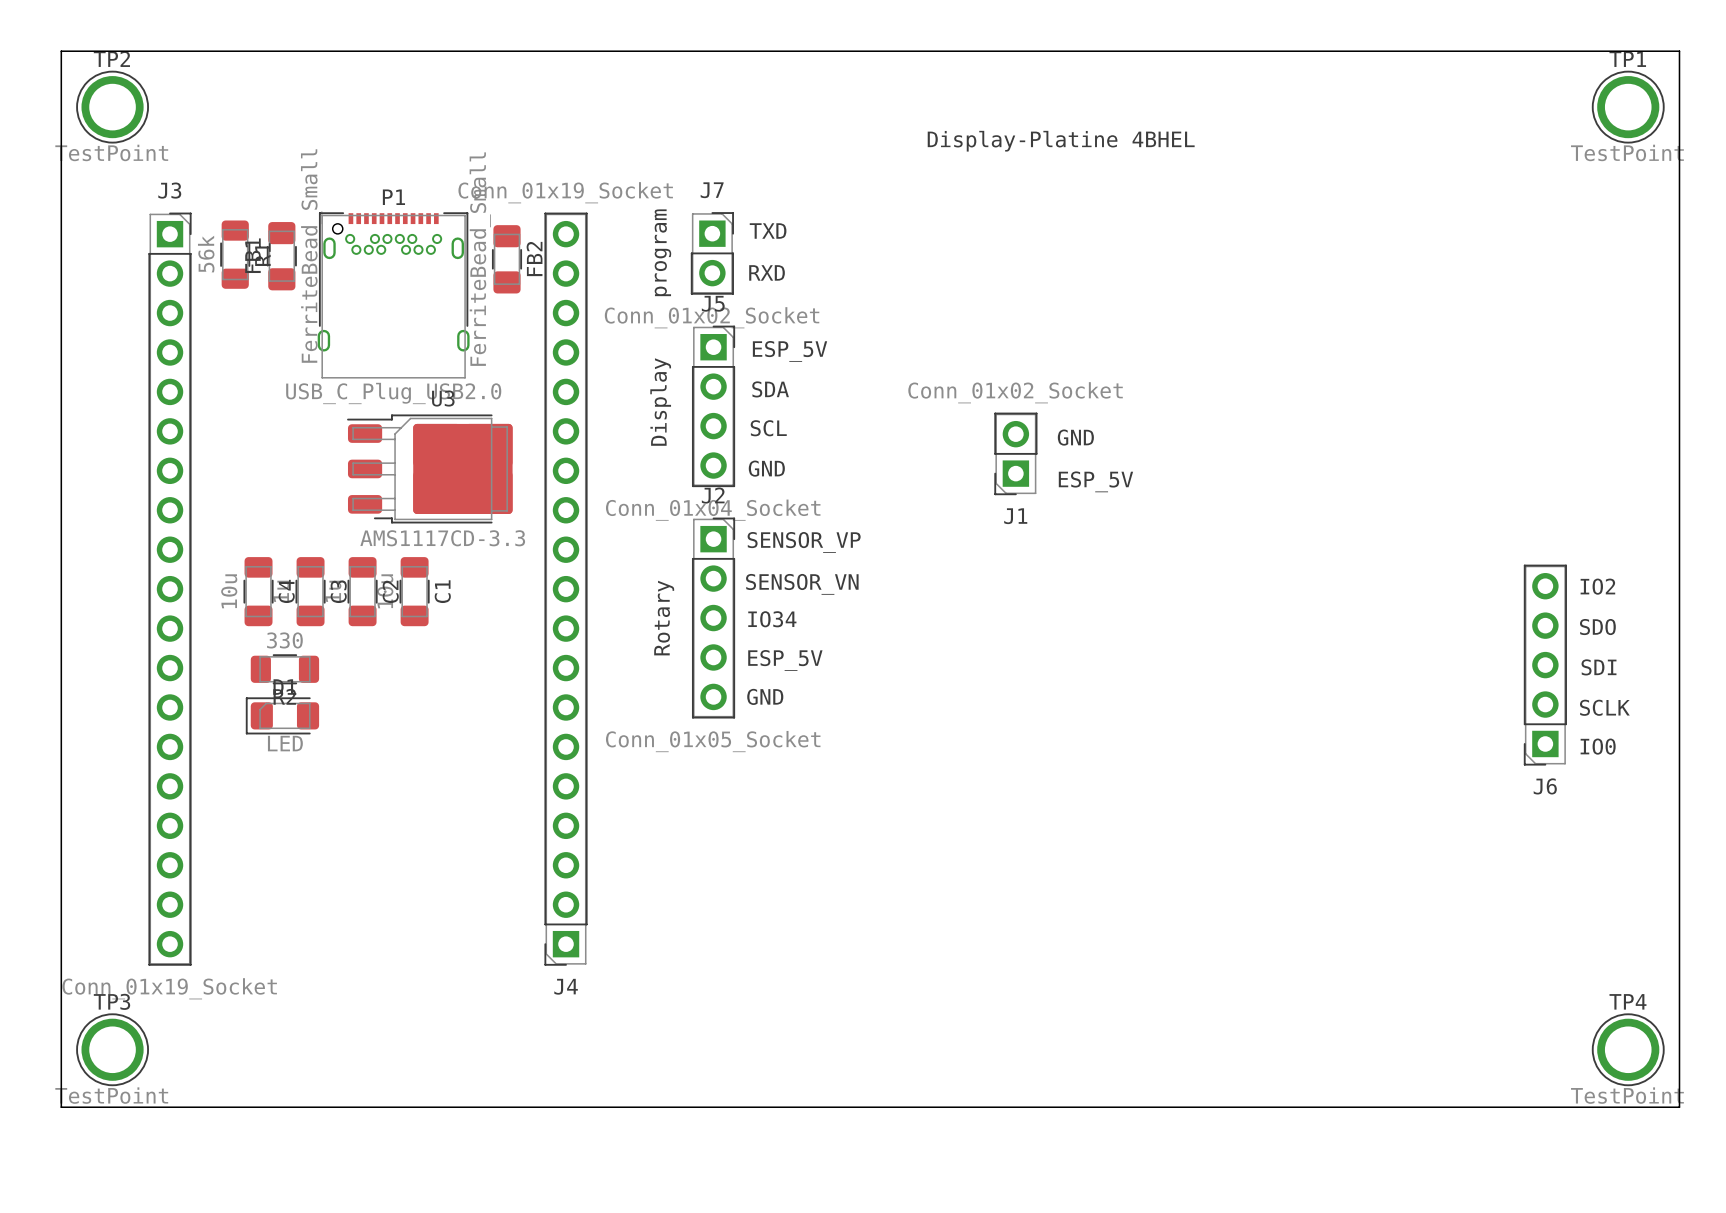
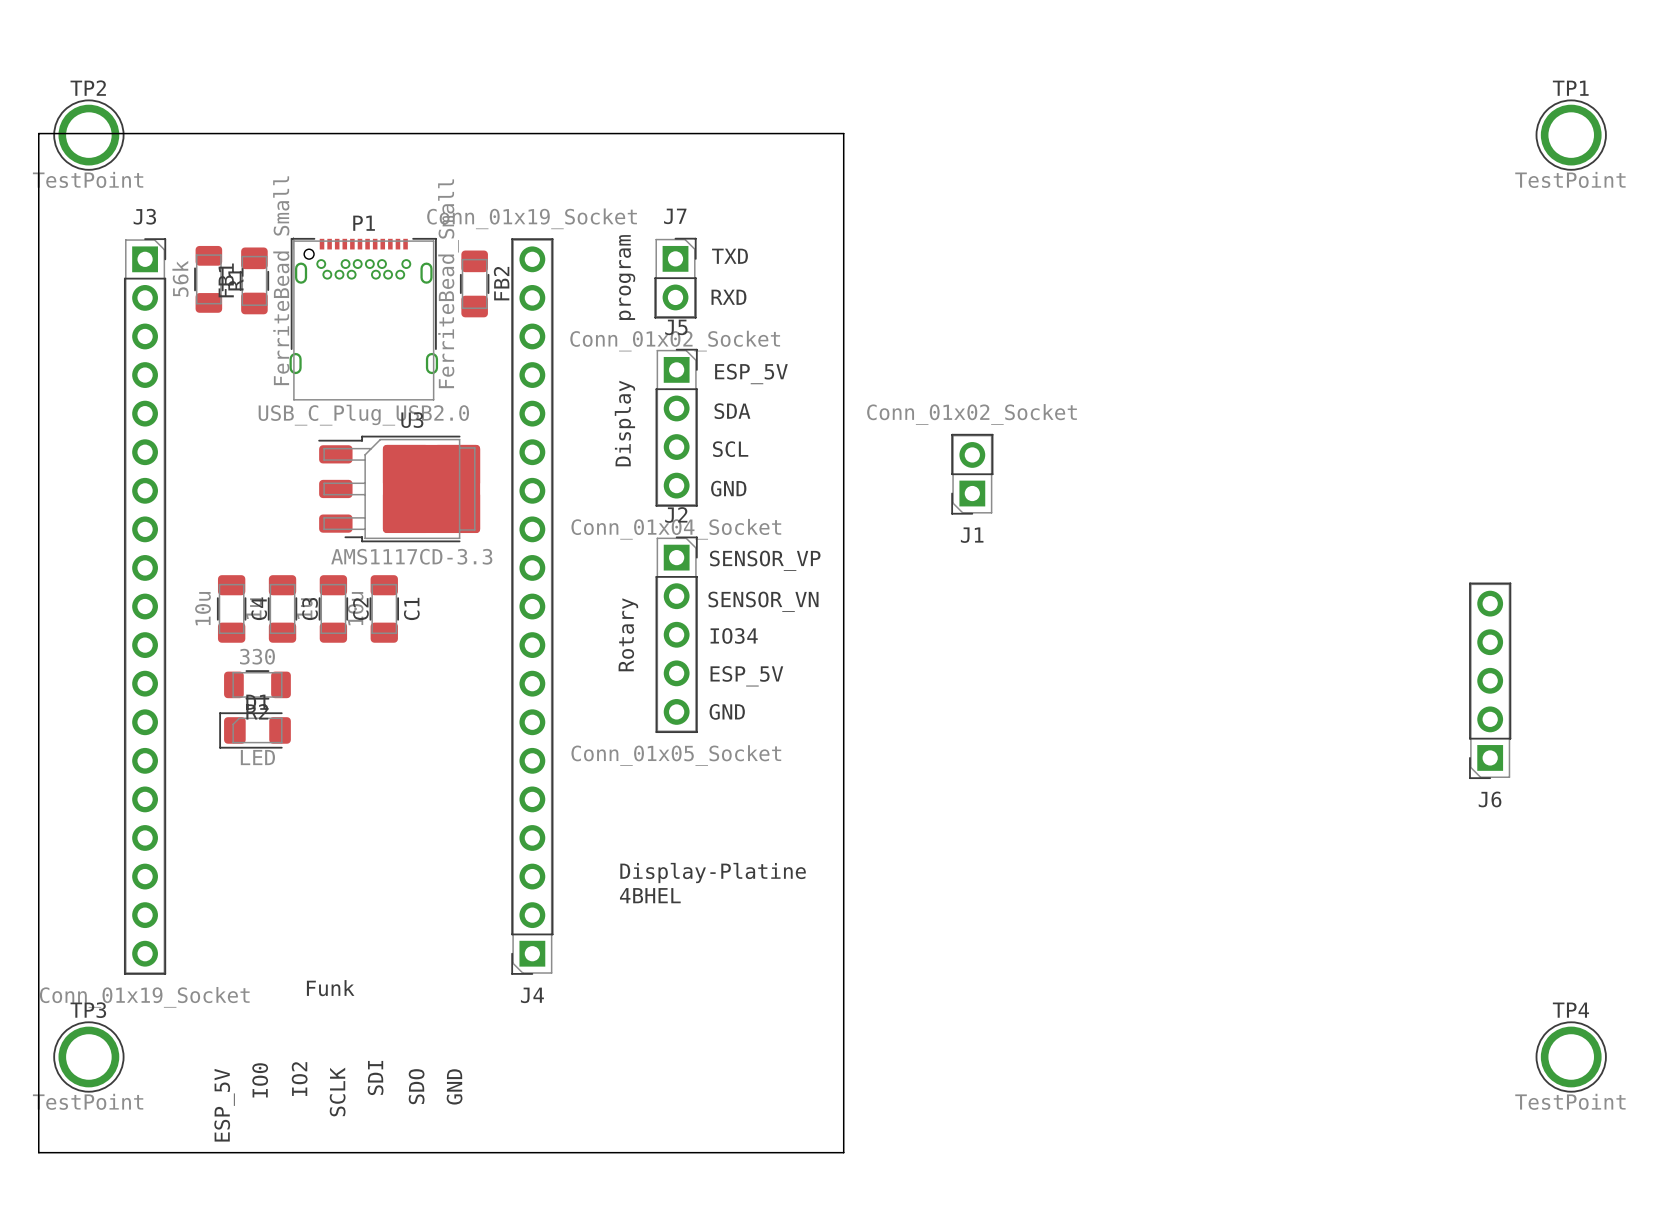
board edge: (61, 105) (61, 51) (1679, 51) (1679, 1107) (61, 1107) -> (38, 133) (843, 133) (843, 1152) (38, 1152) (38, 1113)
text: Display-Platine 4BHEL (1061, 141) -> none
text: GND (1075, 437) -> none
text: ESP_5V (1095, 481) -> none
text: IO2 (1597, 586) -> none
text: SDO (1597, 627) -> none
text: SDI (1599, 667) -> none
text: SCLK (1604, 707) -> none
text: IO0 (1598, 746) -> none
text: none -> Display-Platine (713, 873)
text: none -> 4BHEL (650, 895)
text: none -> Funk (330, 988)
text: none -> SDI (375, 1077)
text: none -> IO2 (299, 1079)
text: none -> IO0 (260, 1080)
text: none -> SDO (416, 1086)
text: none -> GND (454, 1086)
text: none -> SCLK (337, 1091)
text: none -> ESP_5V (224, 1105)

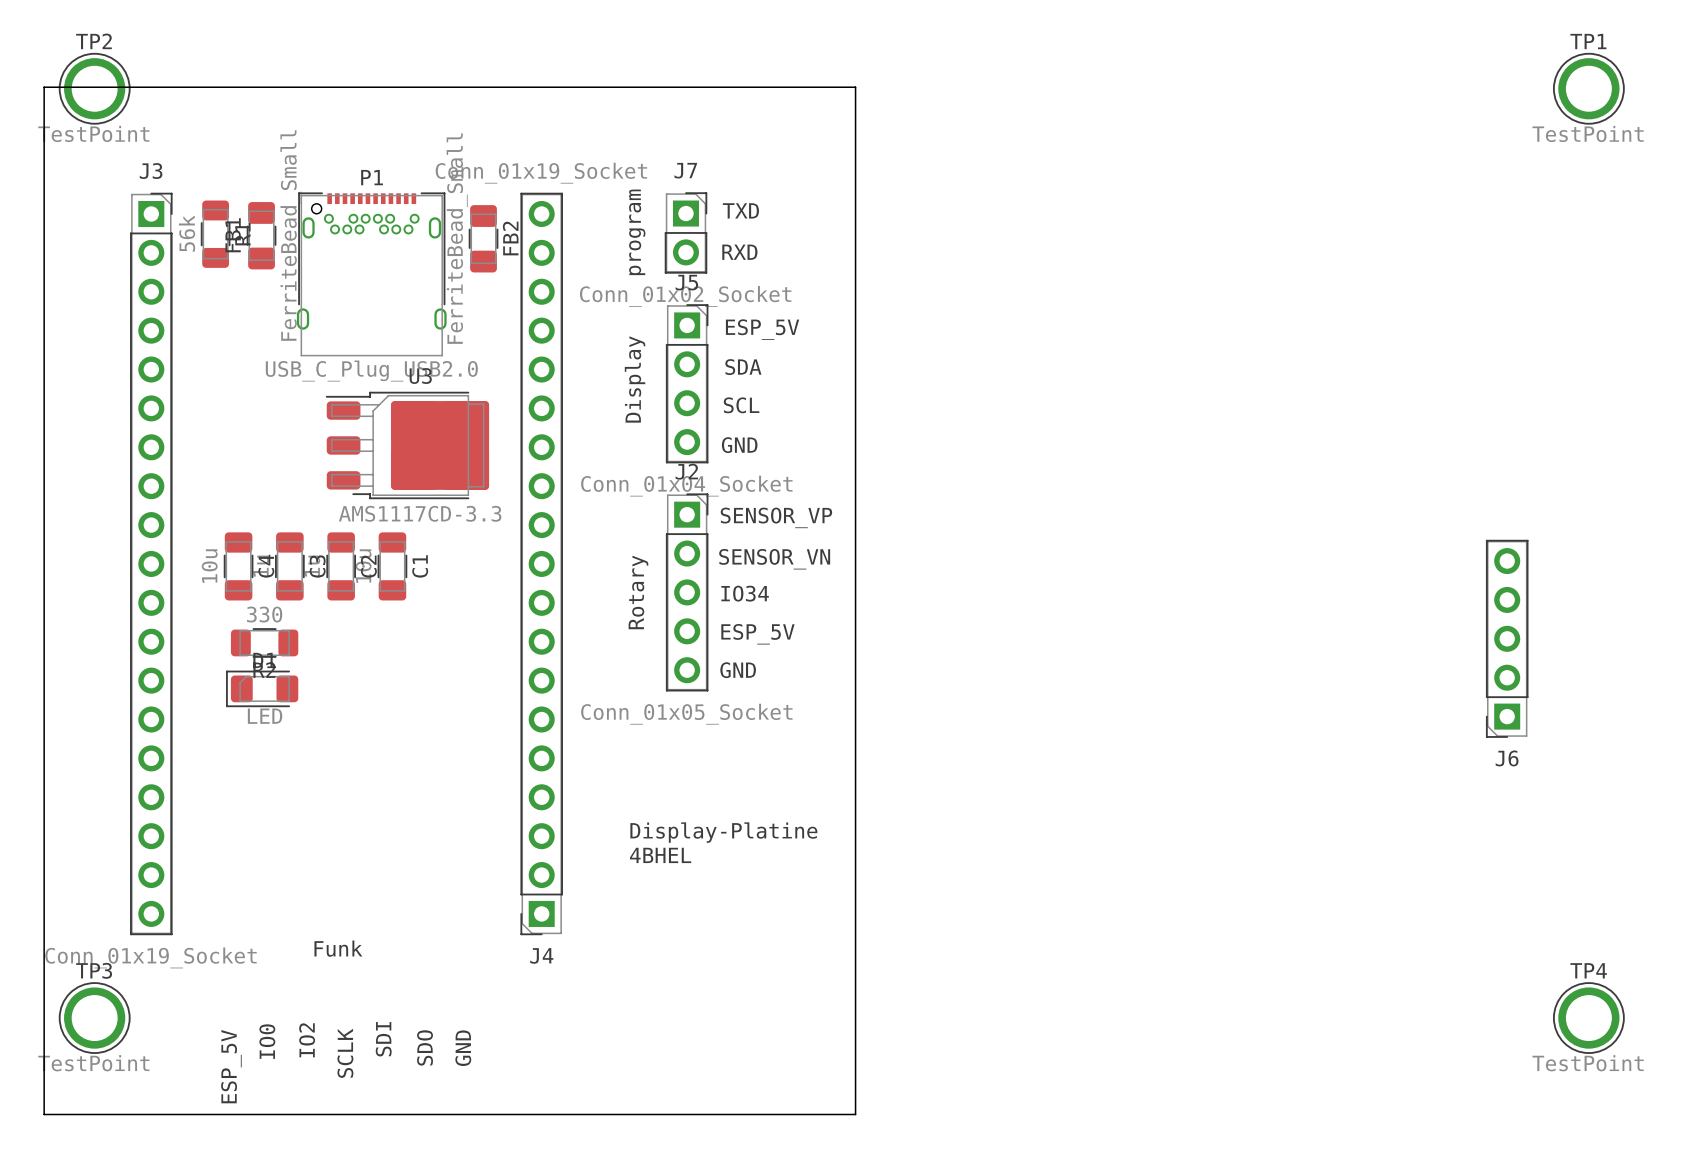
J1: Conn_01x02_Socket (972, 474) -> none

